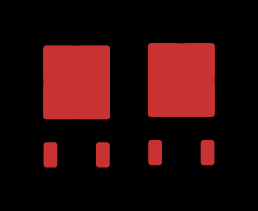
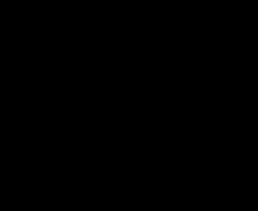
part: (181, 104) -> none
part: (76, 106) -> none

